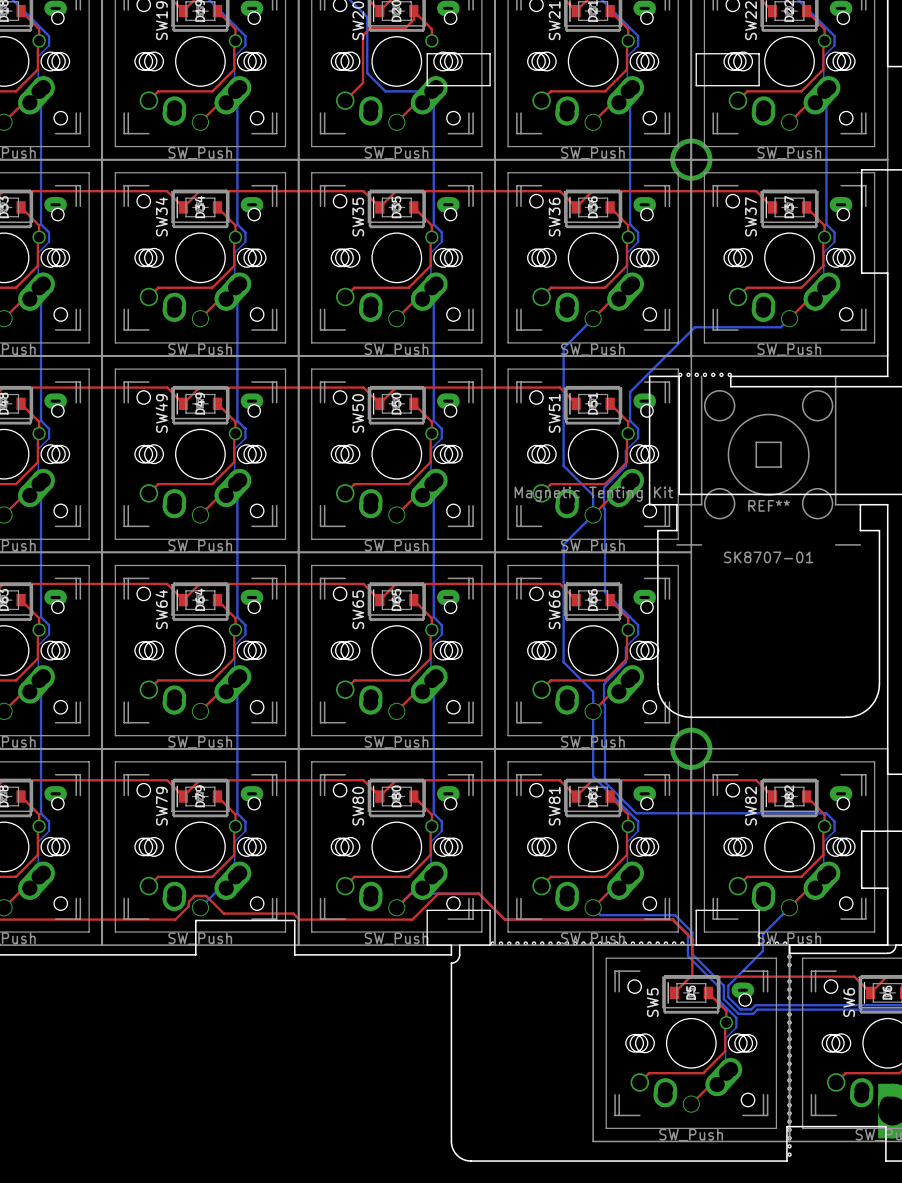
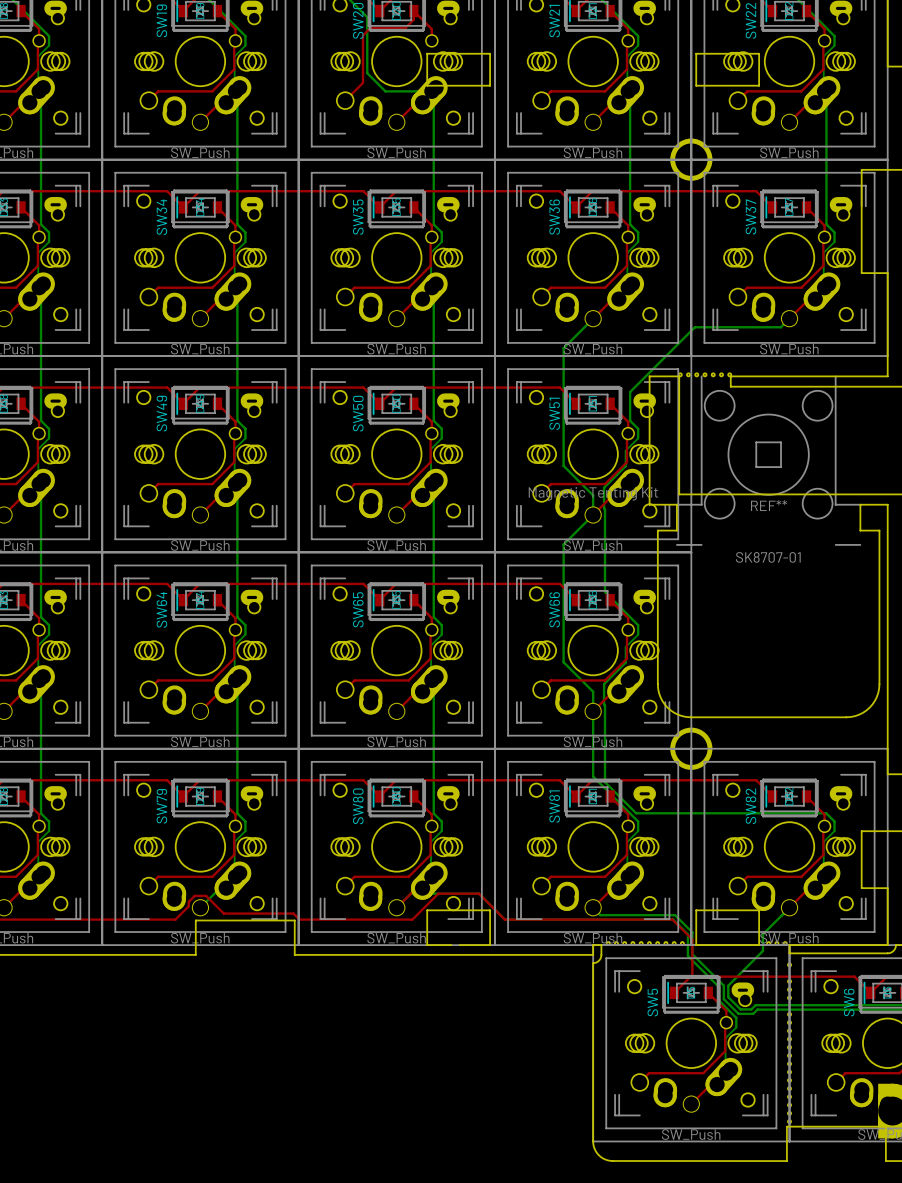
part: (587, 943) -> none
board edge: (451, 945) (451, 954) -> none
board edge: (459, 945) (459, 958) (451, 963) (451, 1141) (454, 1151) (460, 1158) (471, 1161) (786, 1161) -> (451, 954) (593, 954) (593, 945) (601, 945) (600, 958) (593, 963) (593, 1141) (596, 1151) (602, 1158) (612, 1161) (786, 1161)
part: (789, 1055) -> none

